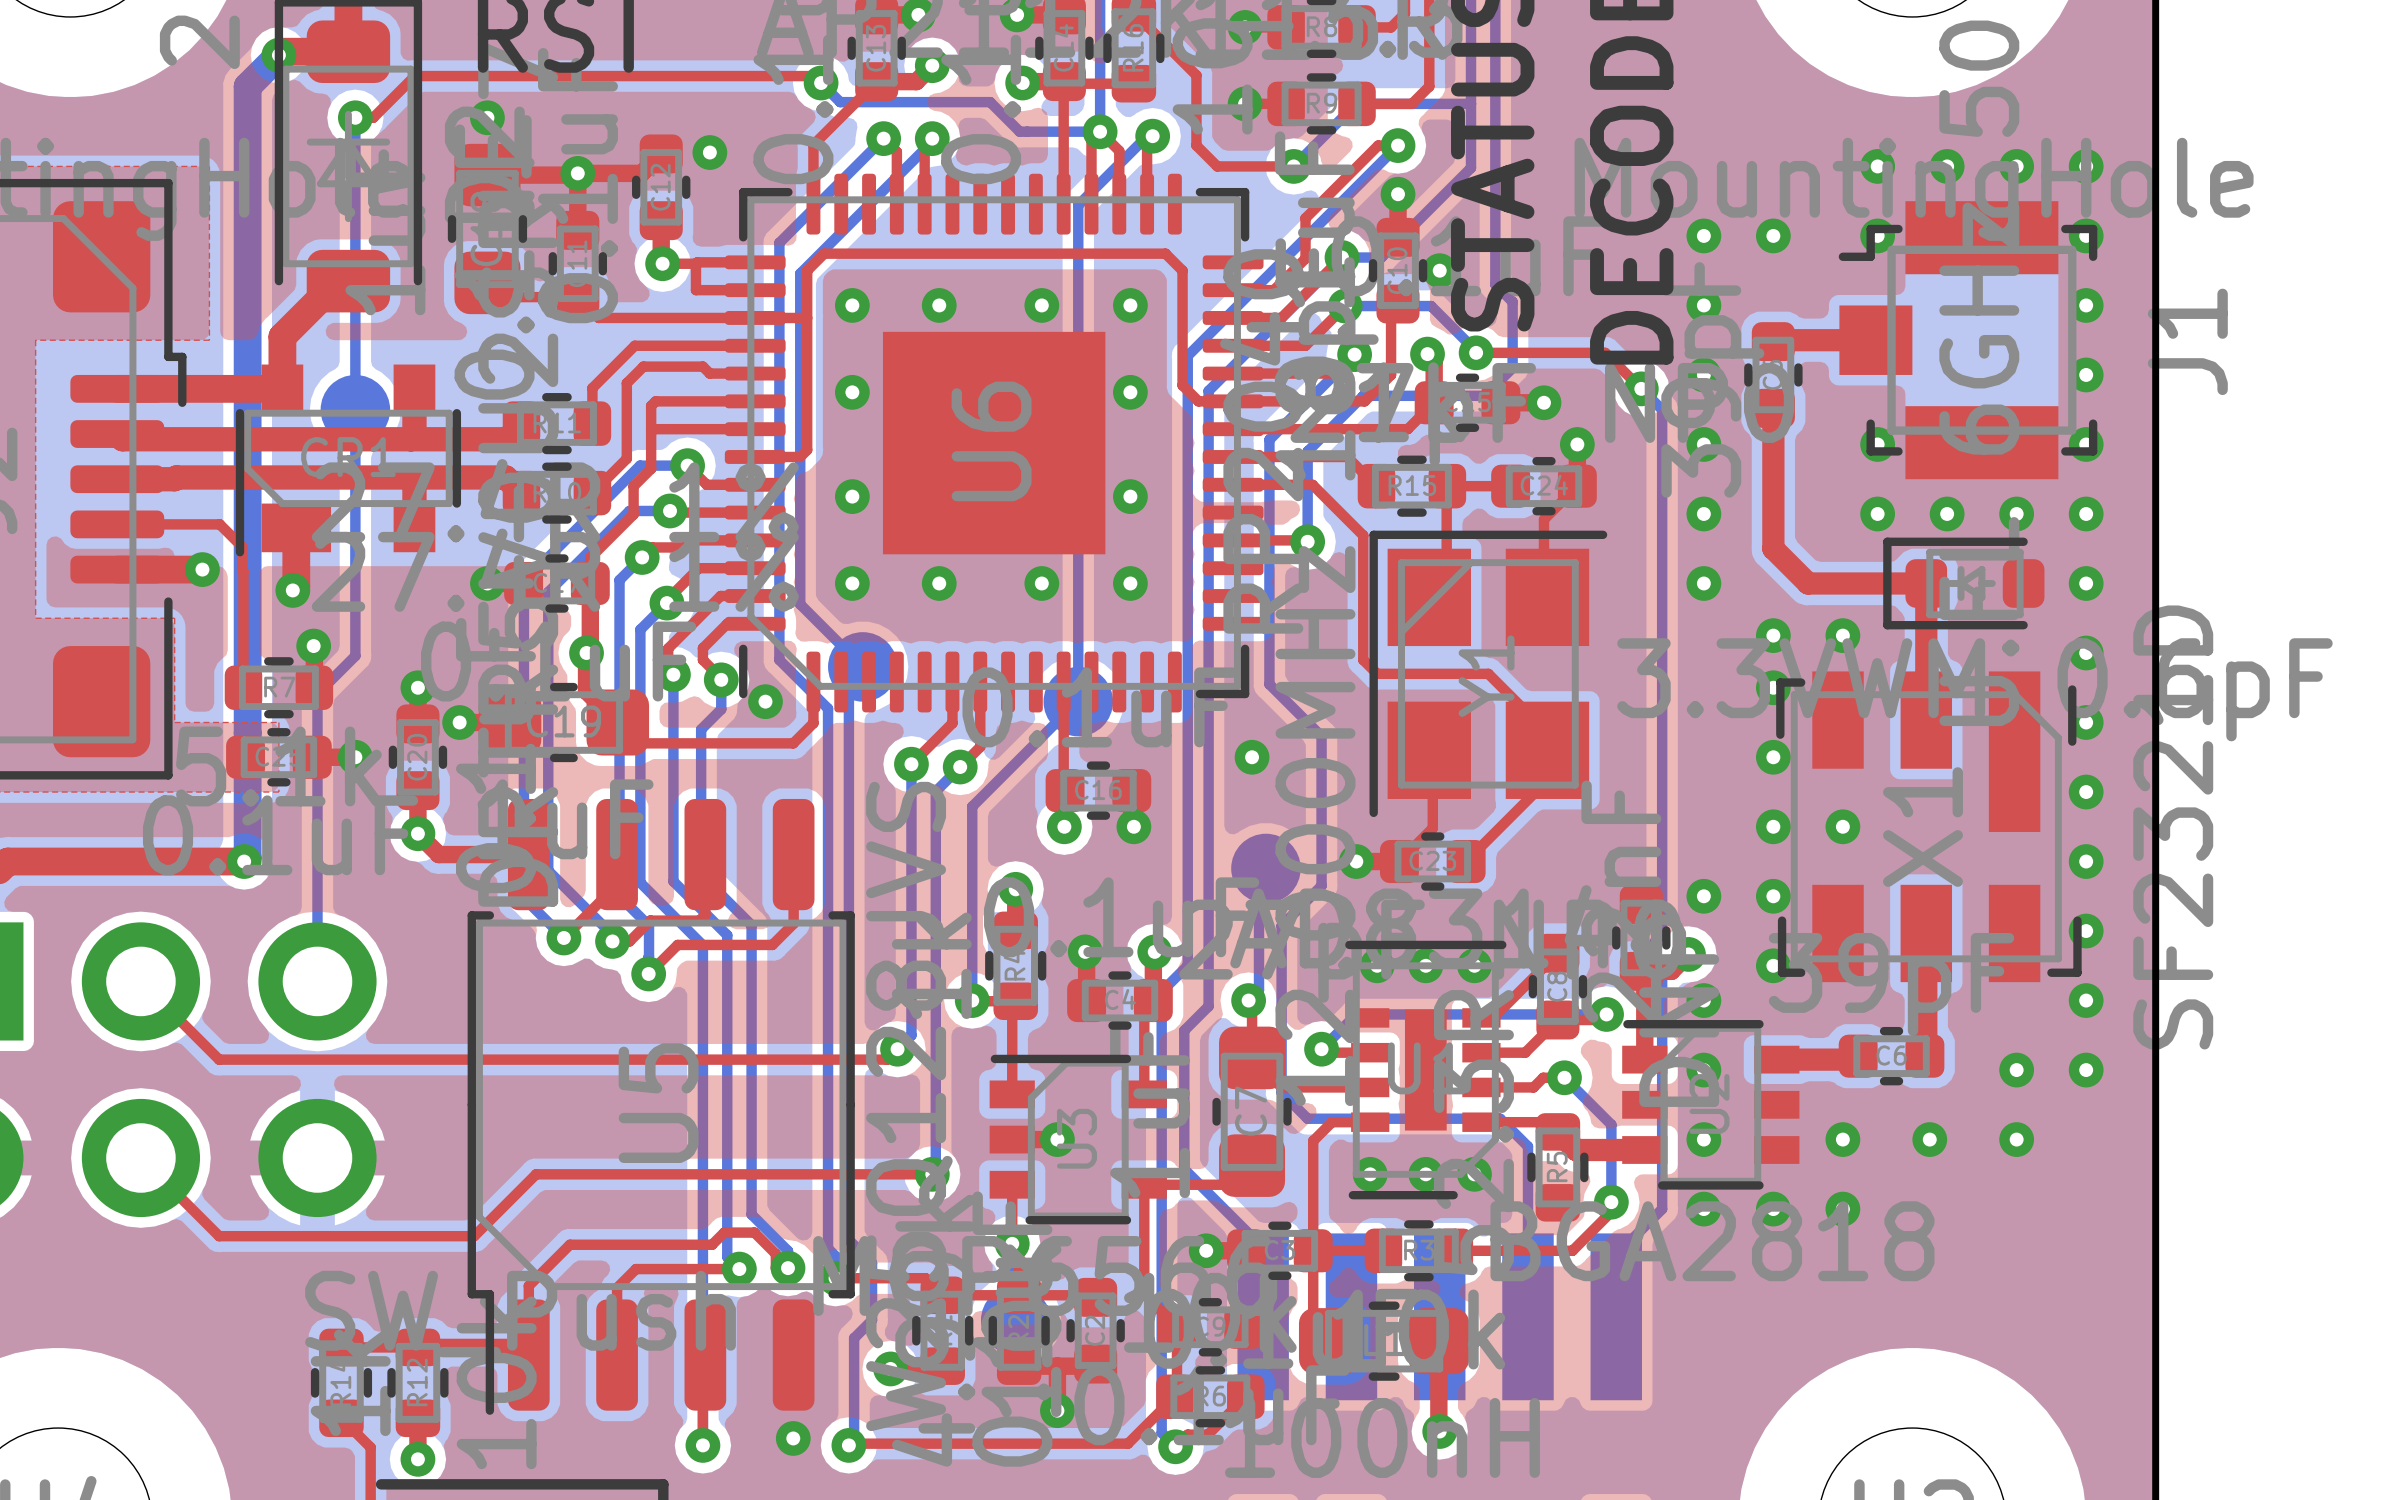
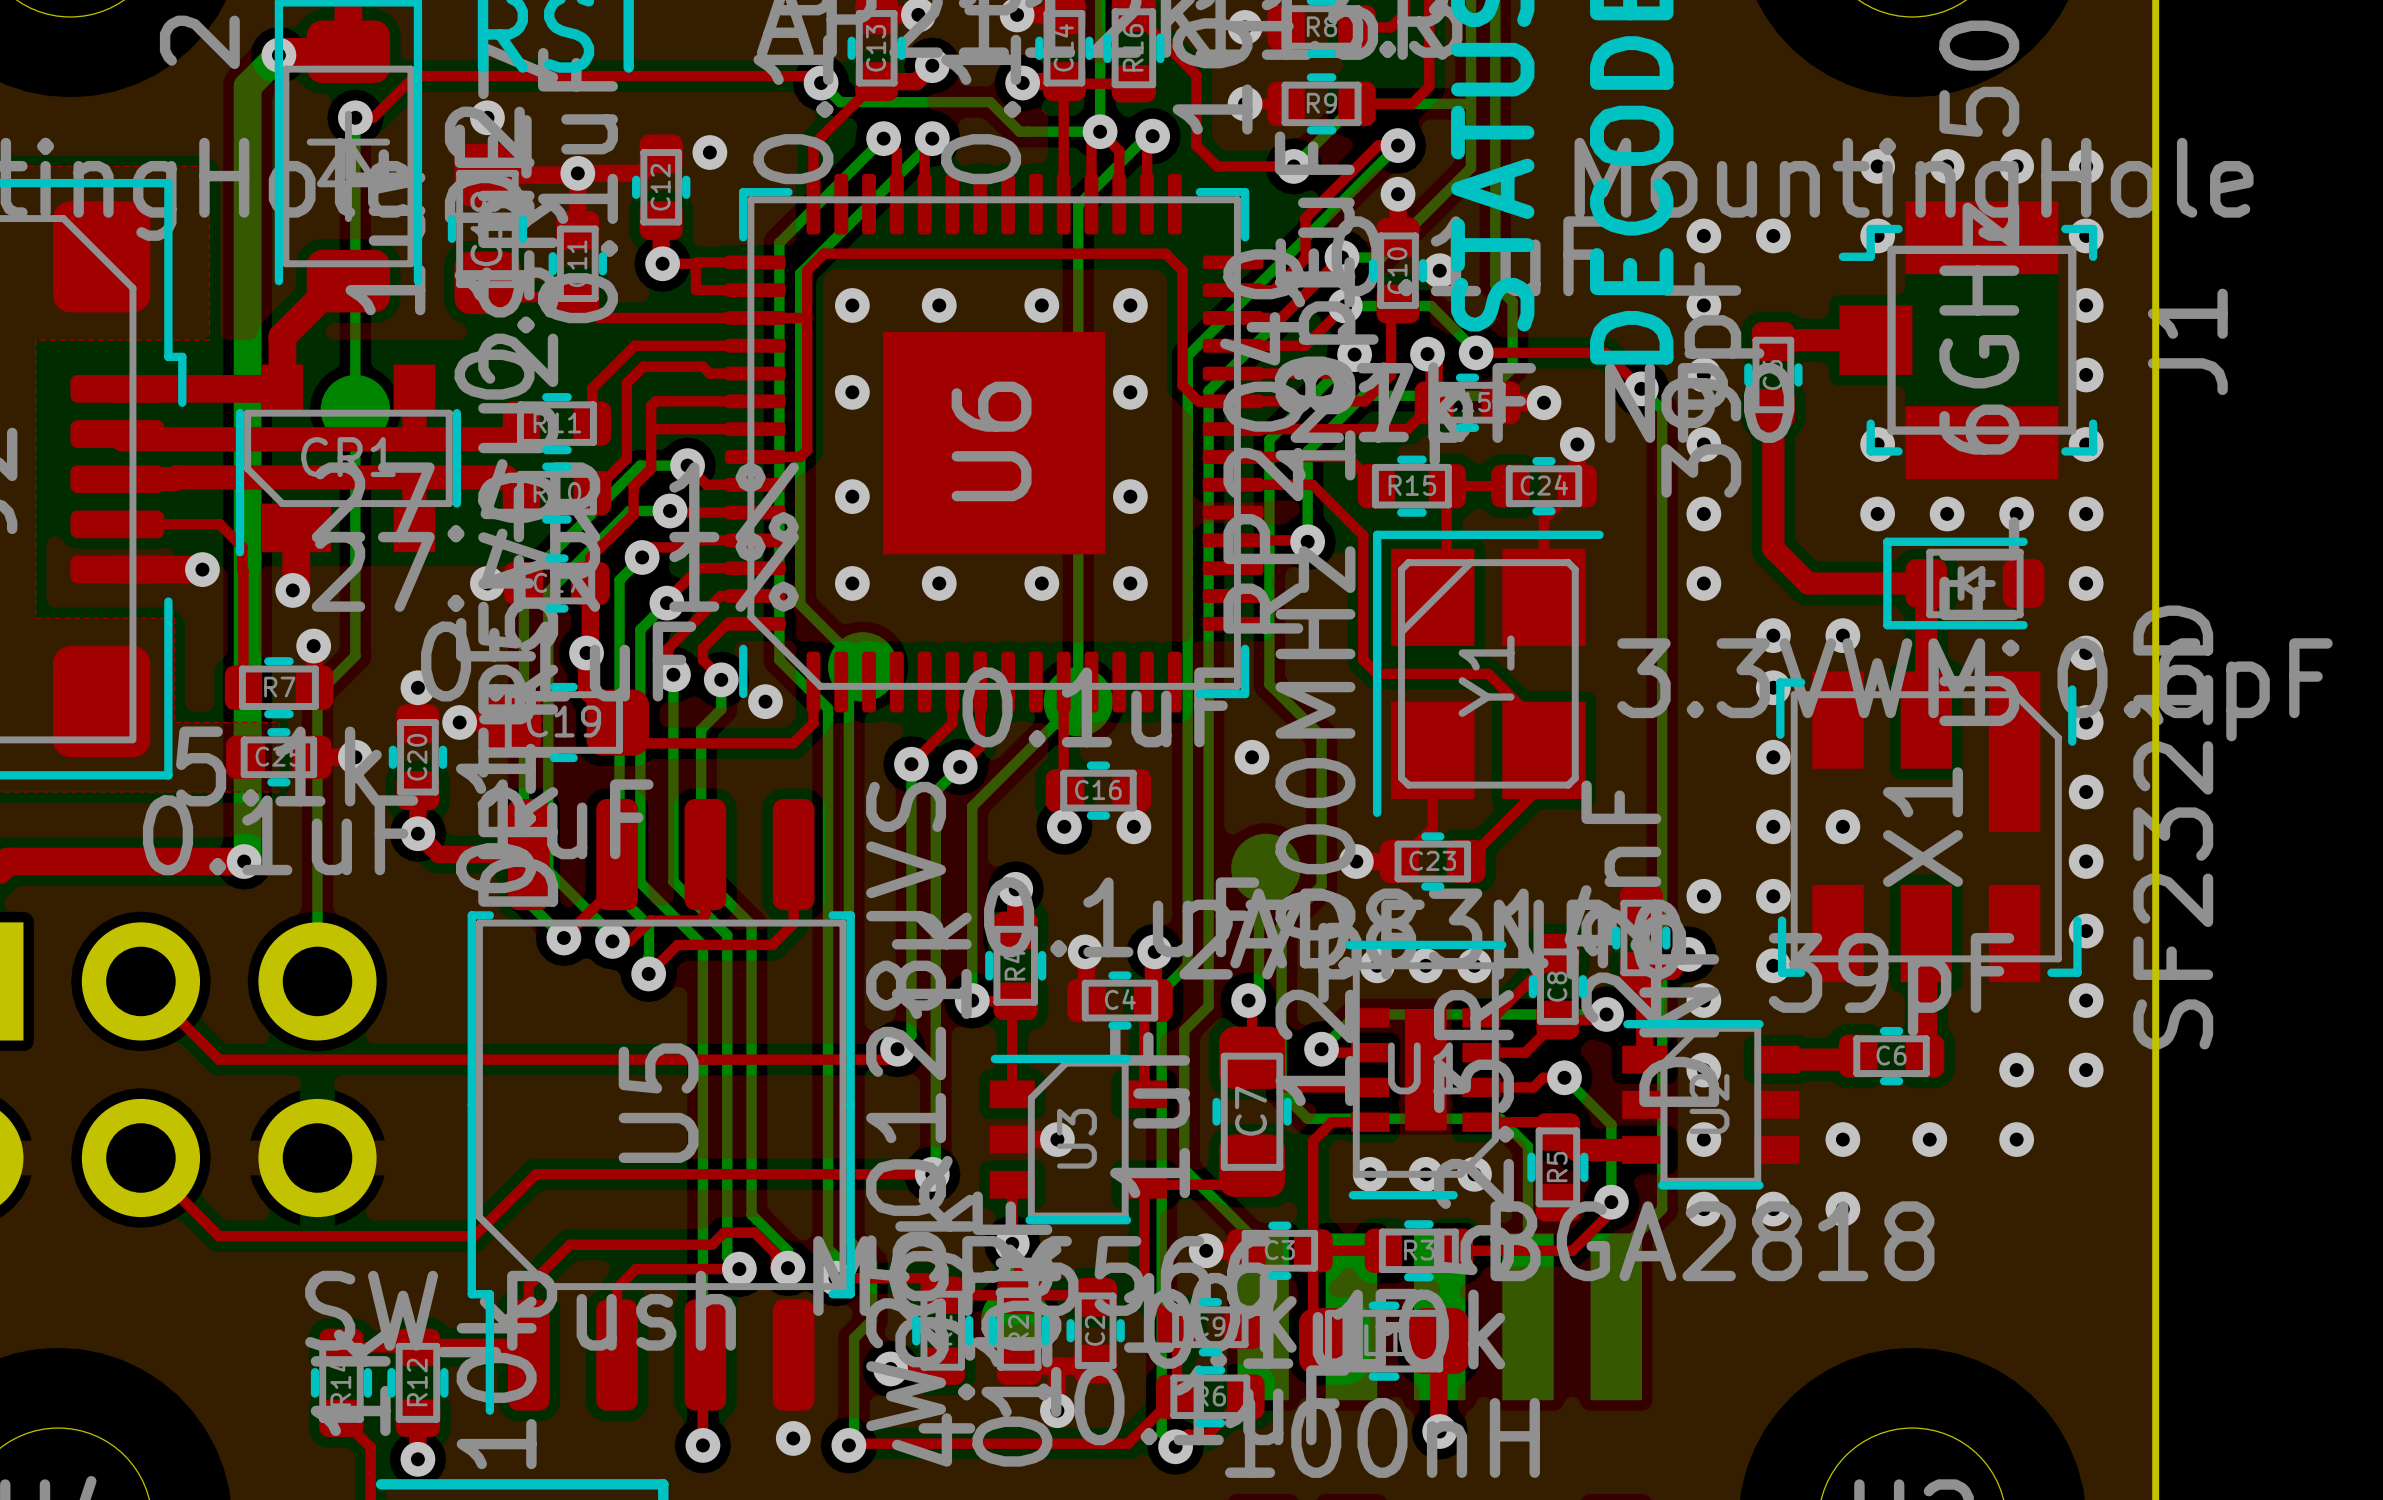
Y1 footprint: [1369, 530, 1608, 818] -> [1373, 530, 1604, 818]

